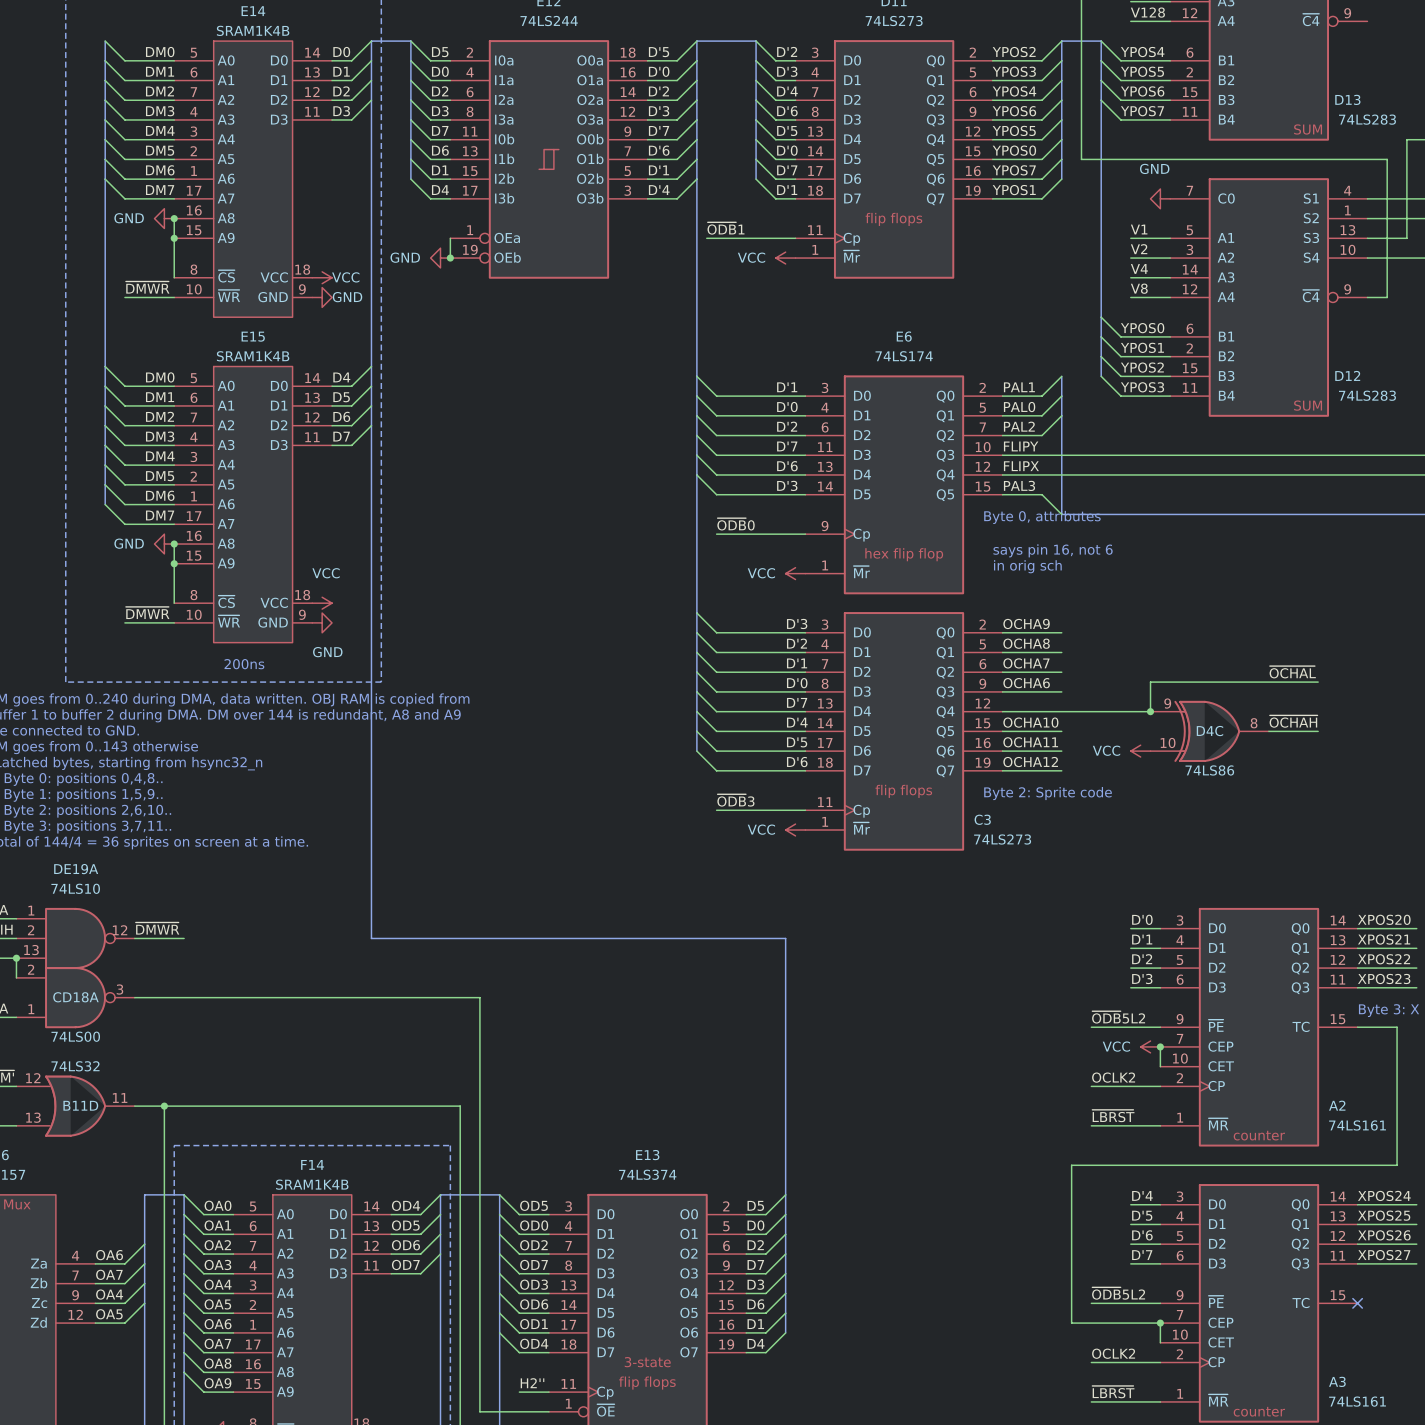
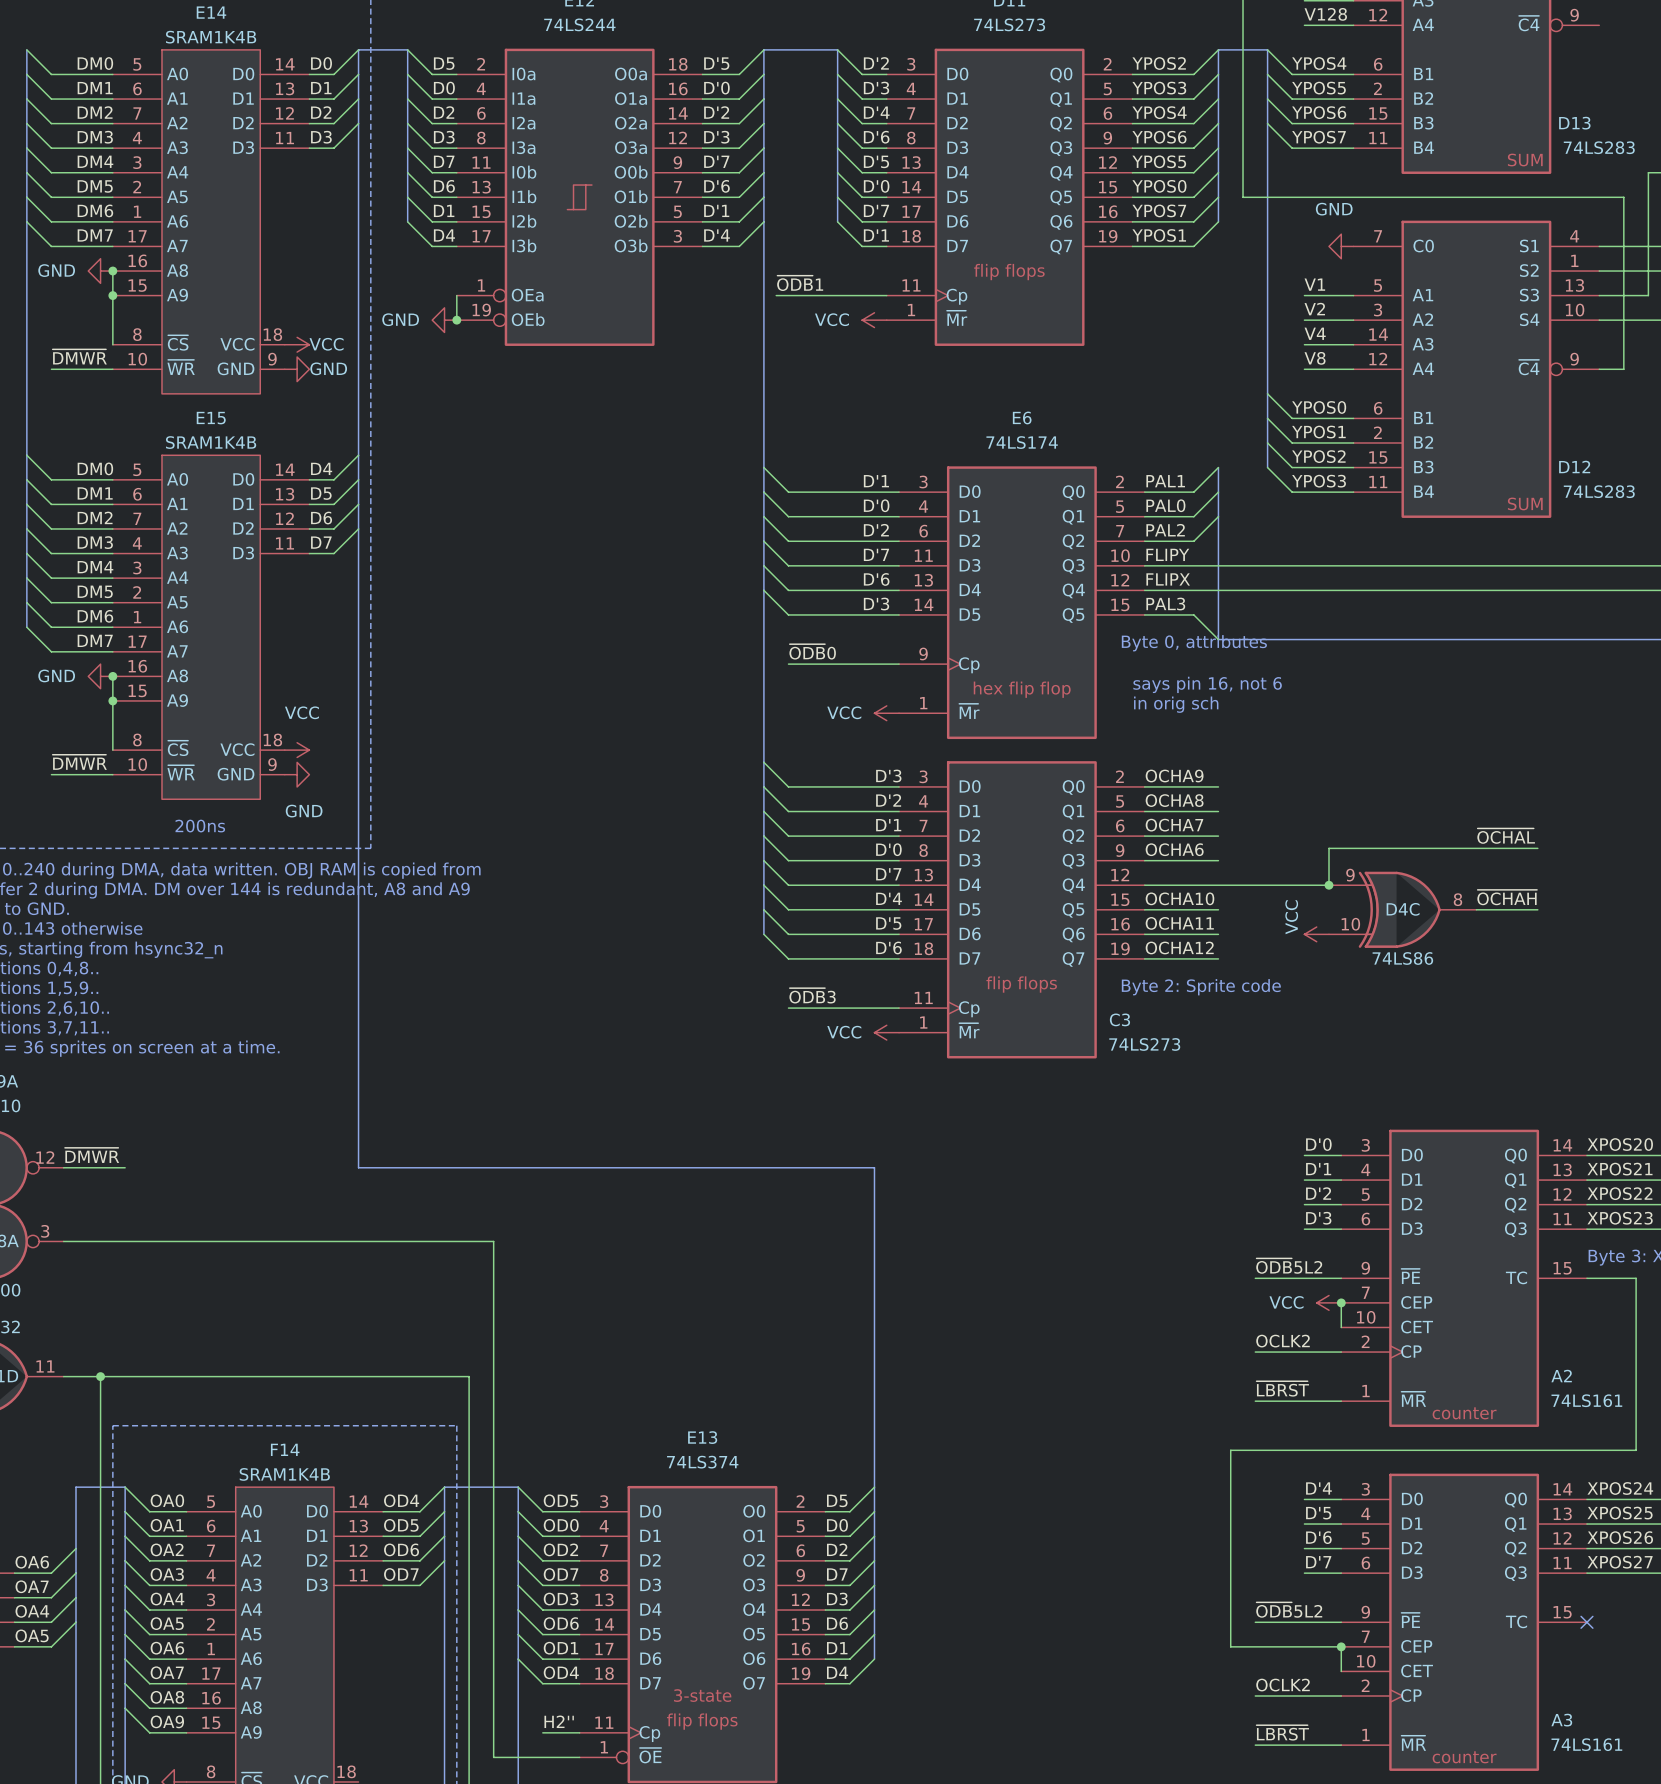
power symbol text rotation: 0° (1106, 750) -> 90° counterclockwise (1291, 917)

